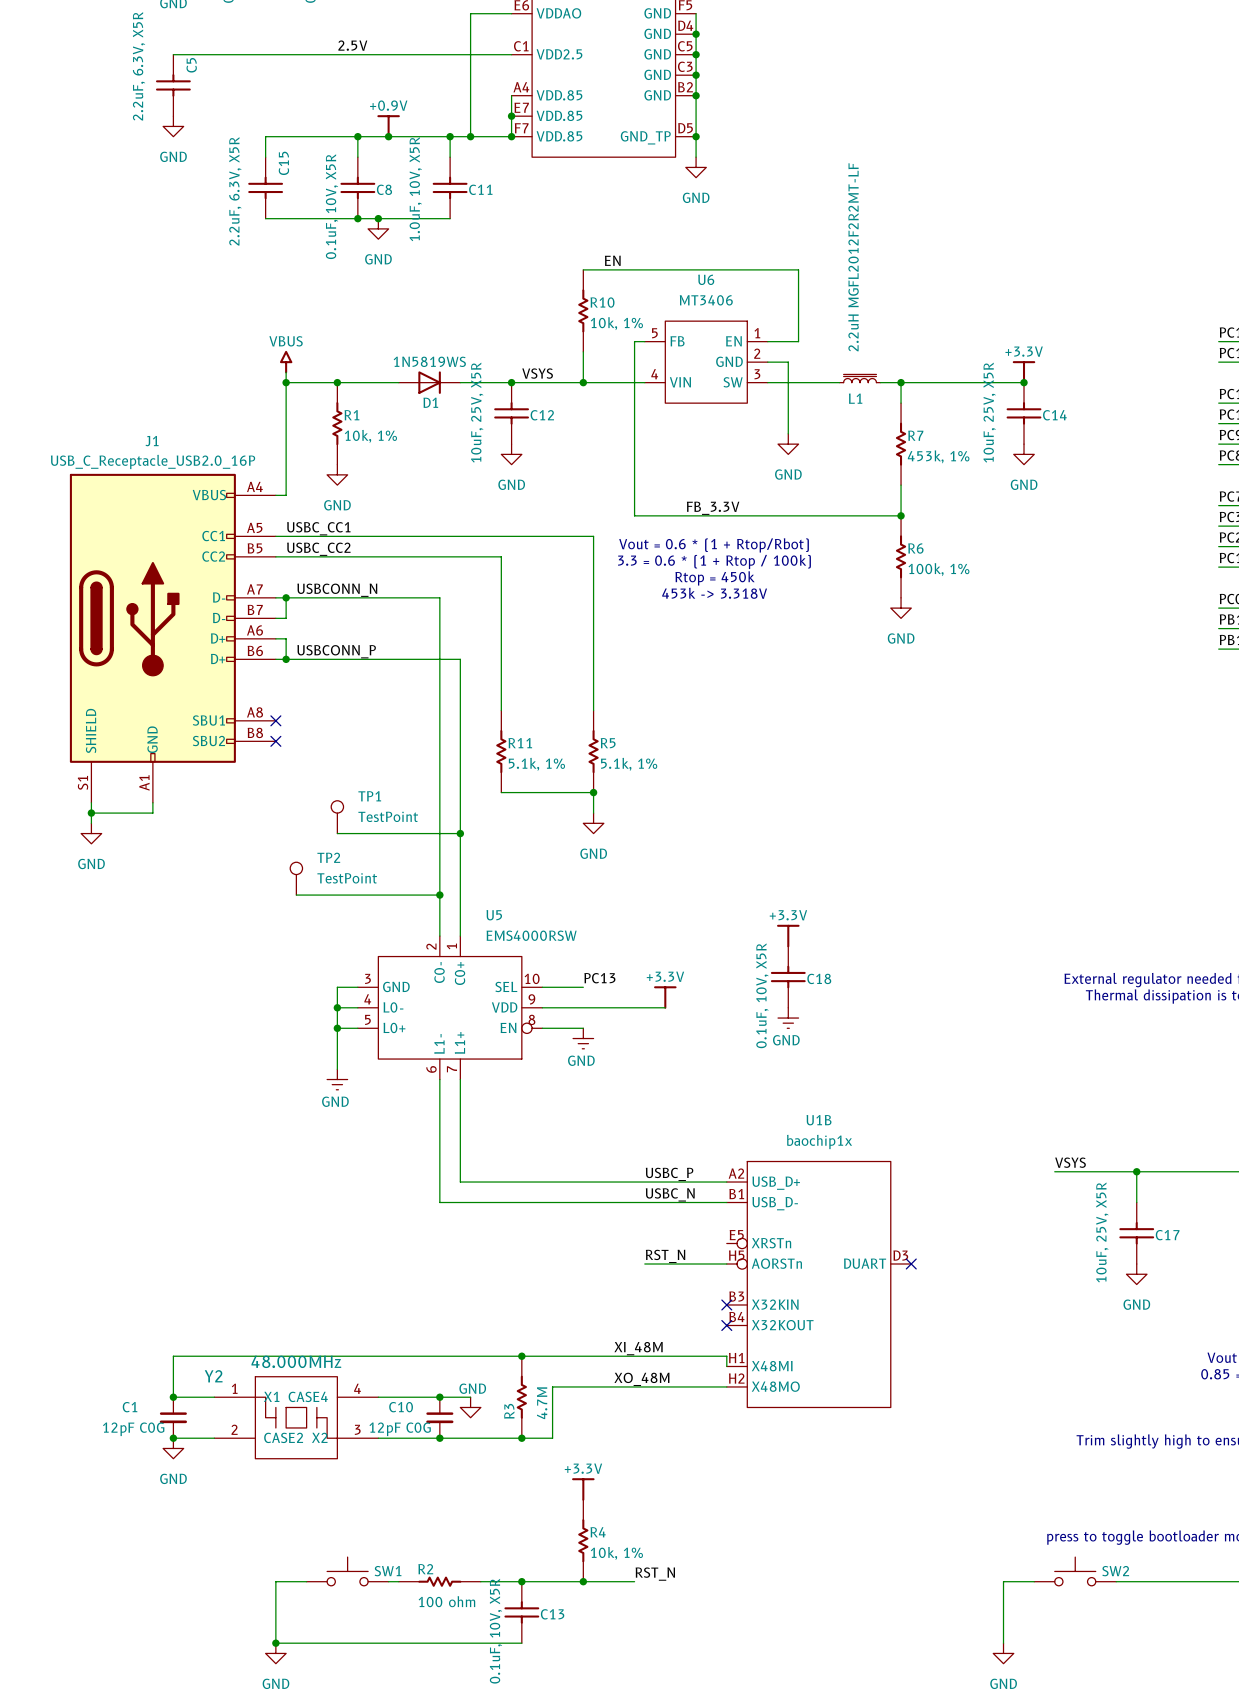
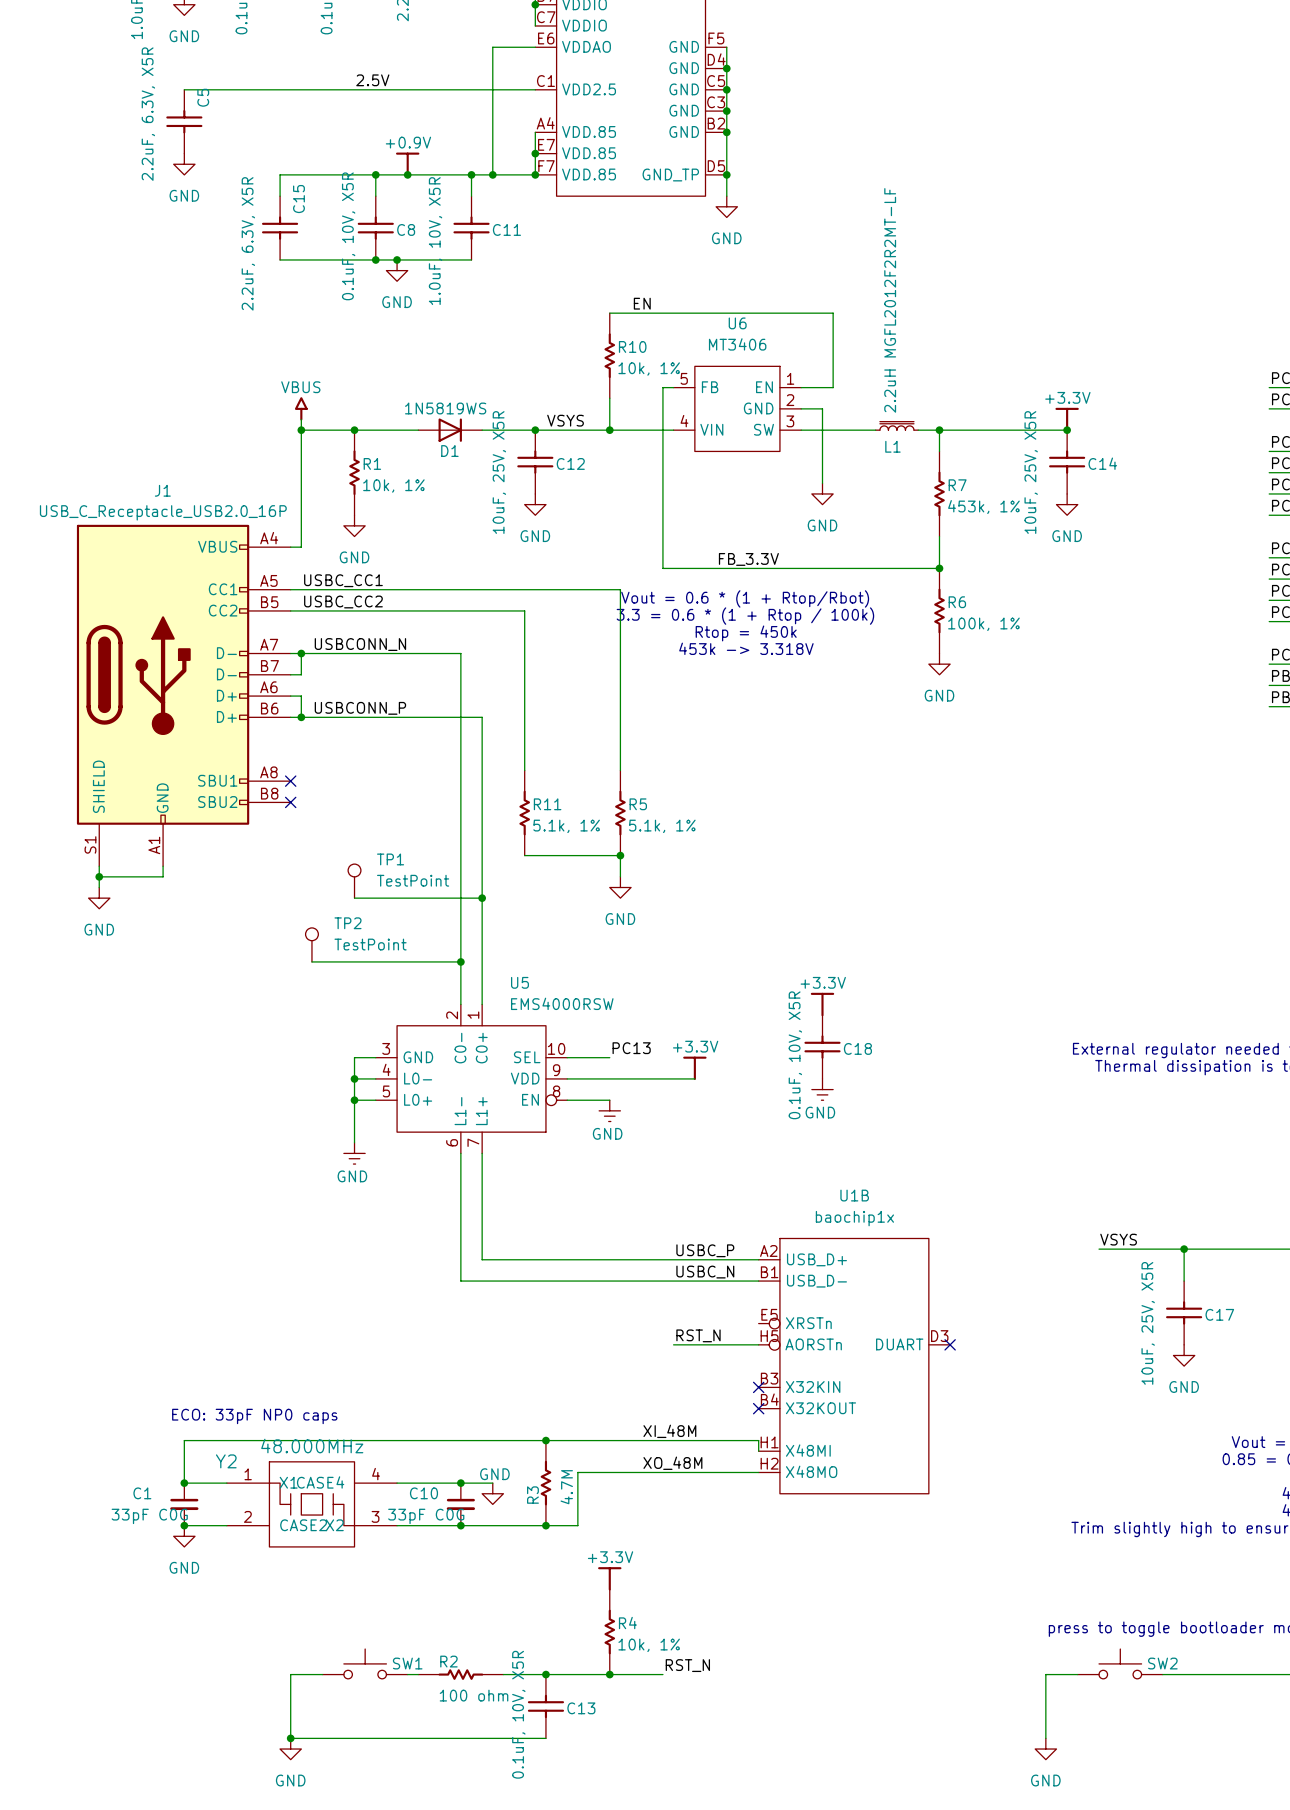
text: none -> ECO: 33pF NP0 caps (254, 1416)
C1 value: 12pF C0G (133, 1429) -> 33pF C0G (149, 1516)
C10 value: 12pF C0G (400, 1429) -> 33pF C0G (426, 1516)

